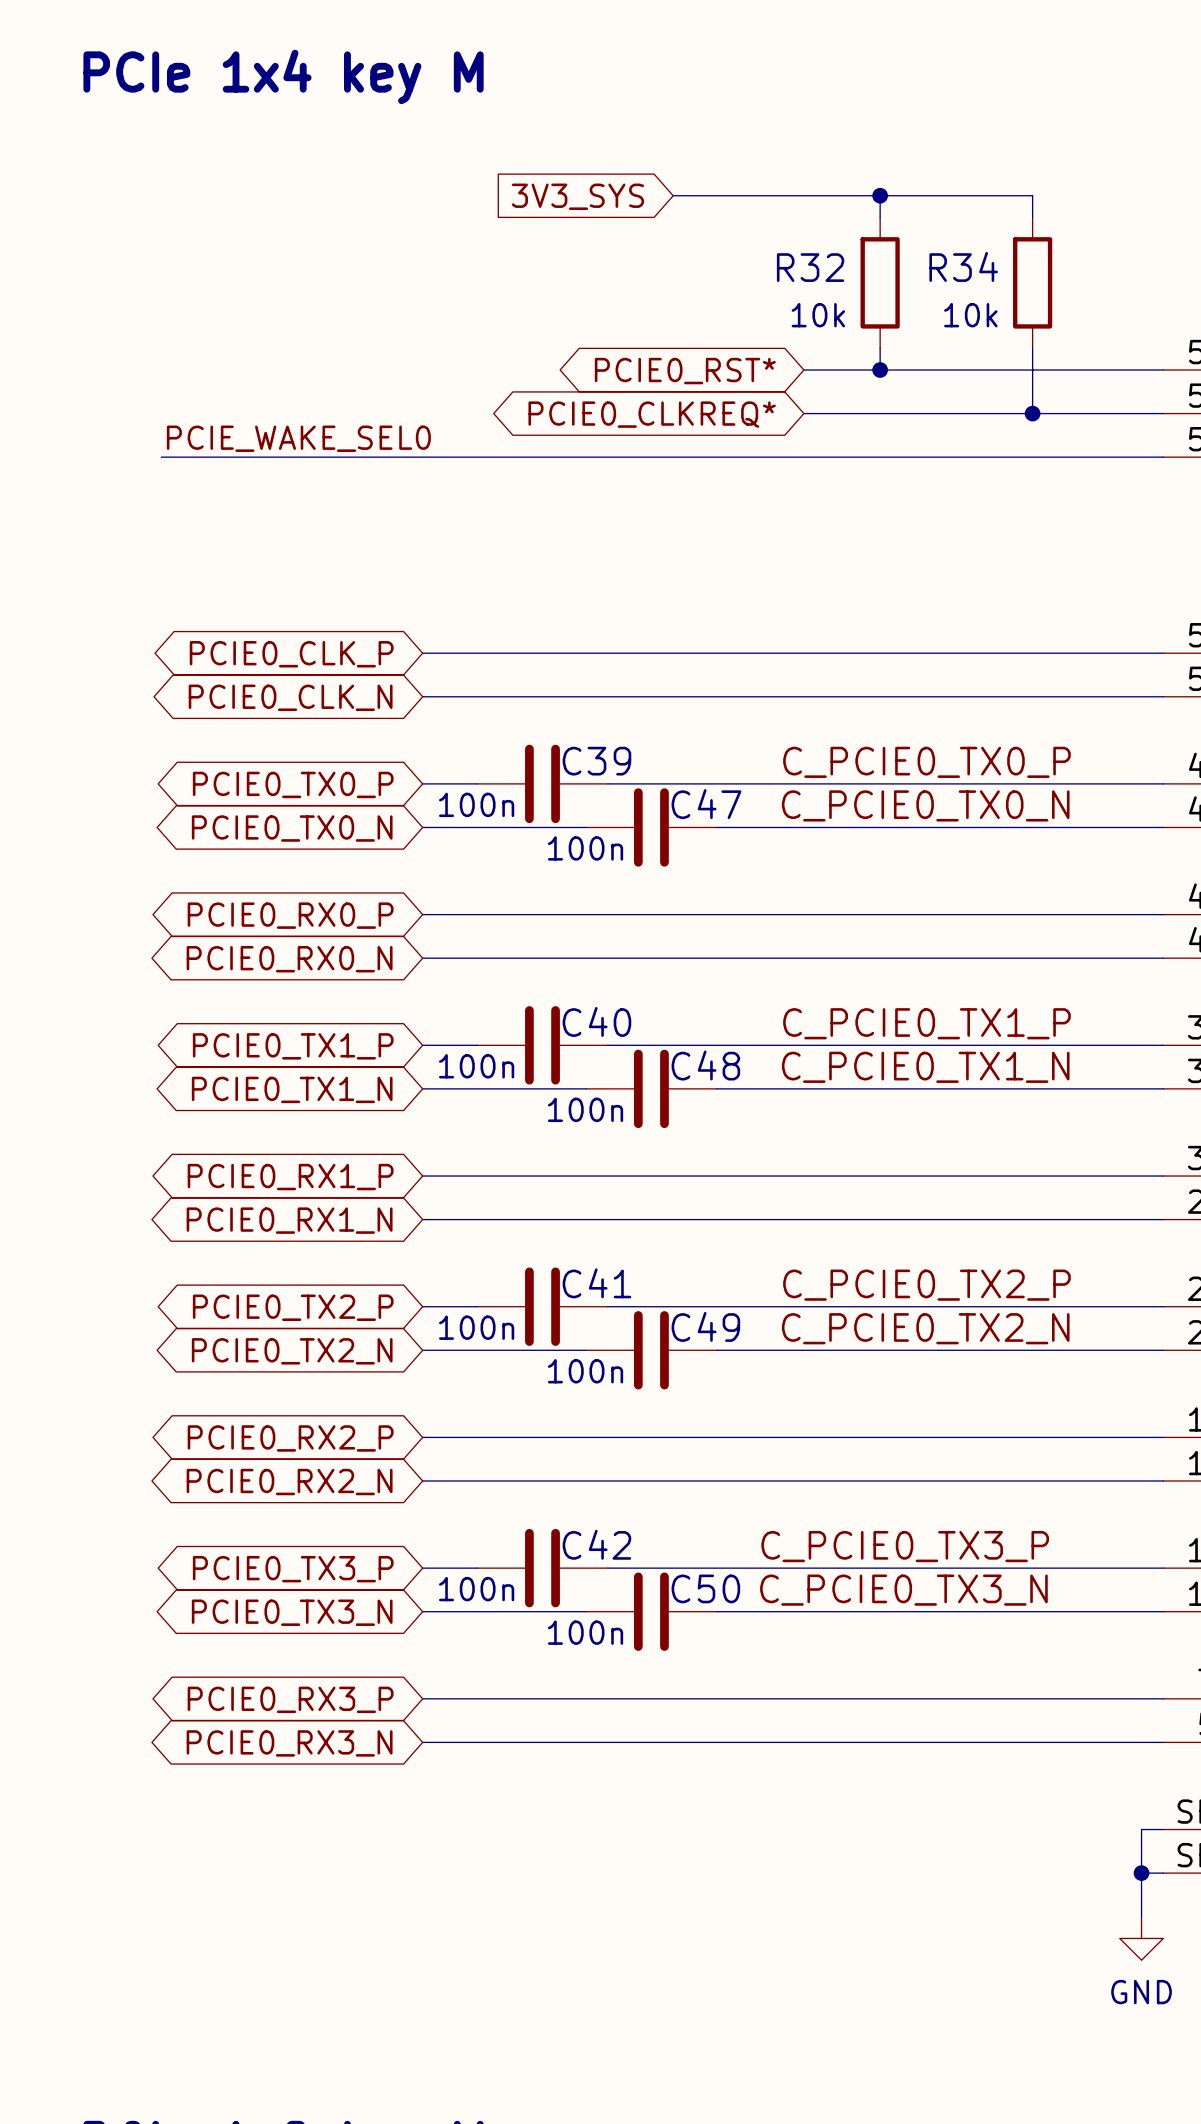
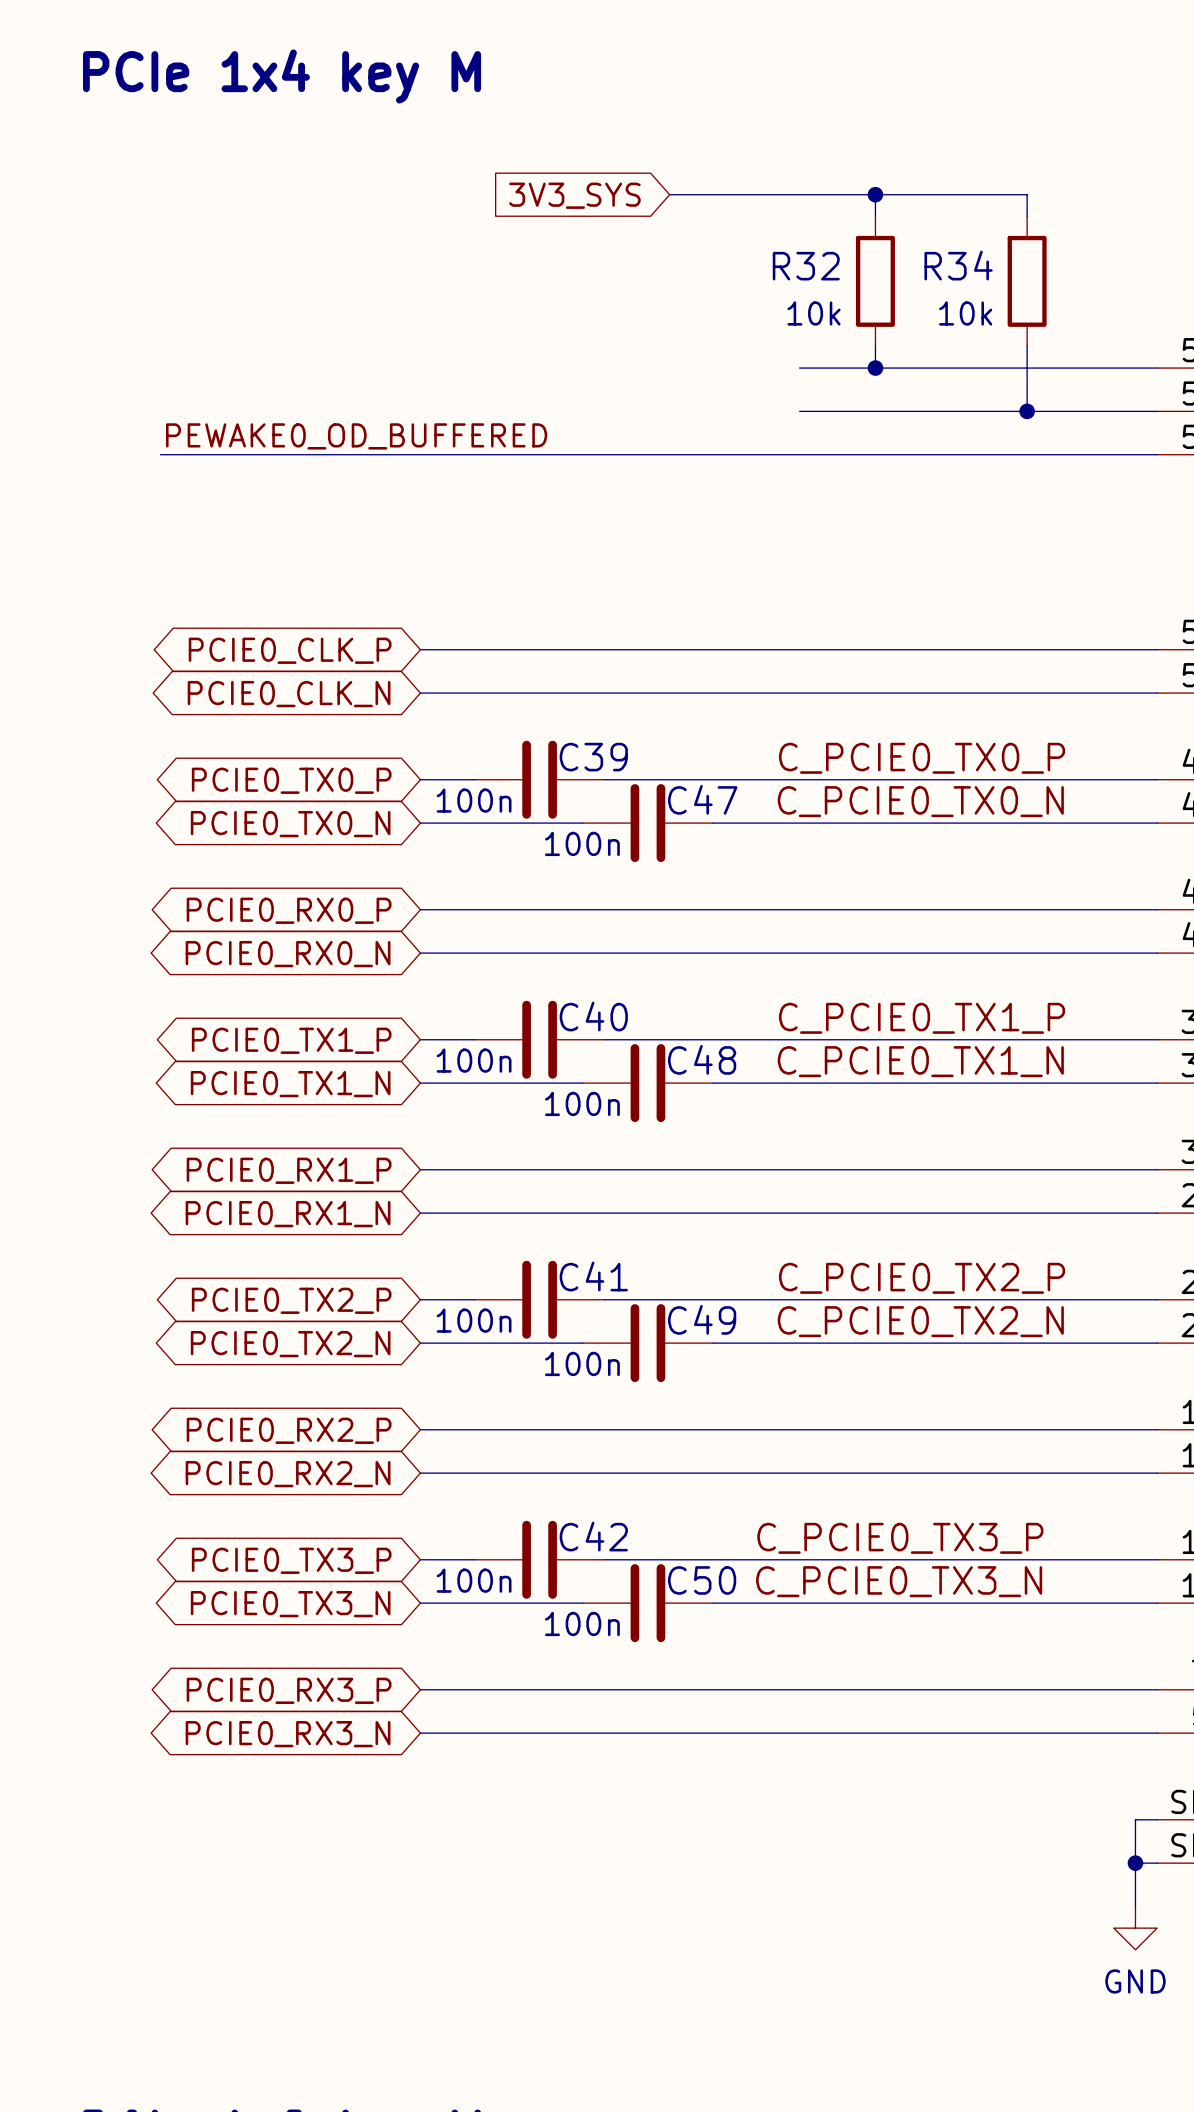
global label: PCIE0_RST* (685, 371) -> none
global label: PCIE0_CLKREQ* (652, 414) -> none
label: PCIE_WAKE_SEL0 (298, 438) -> PEWAKE0_OD_BUFFERED (356, 436)

